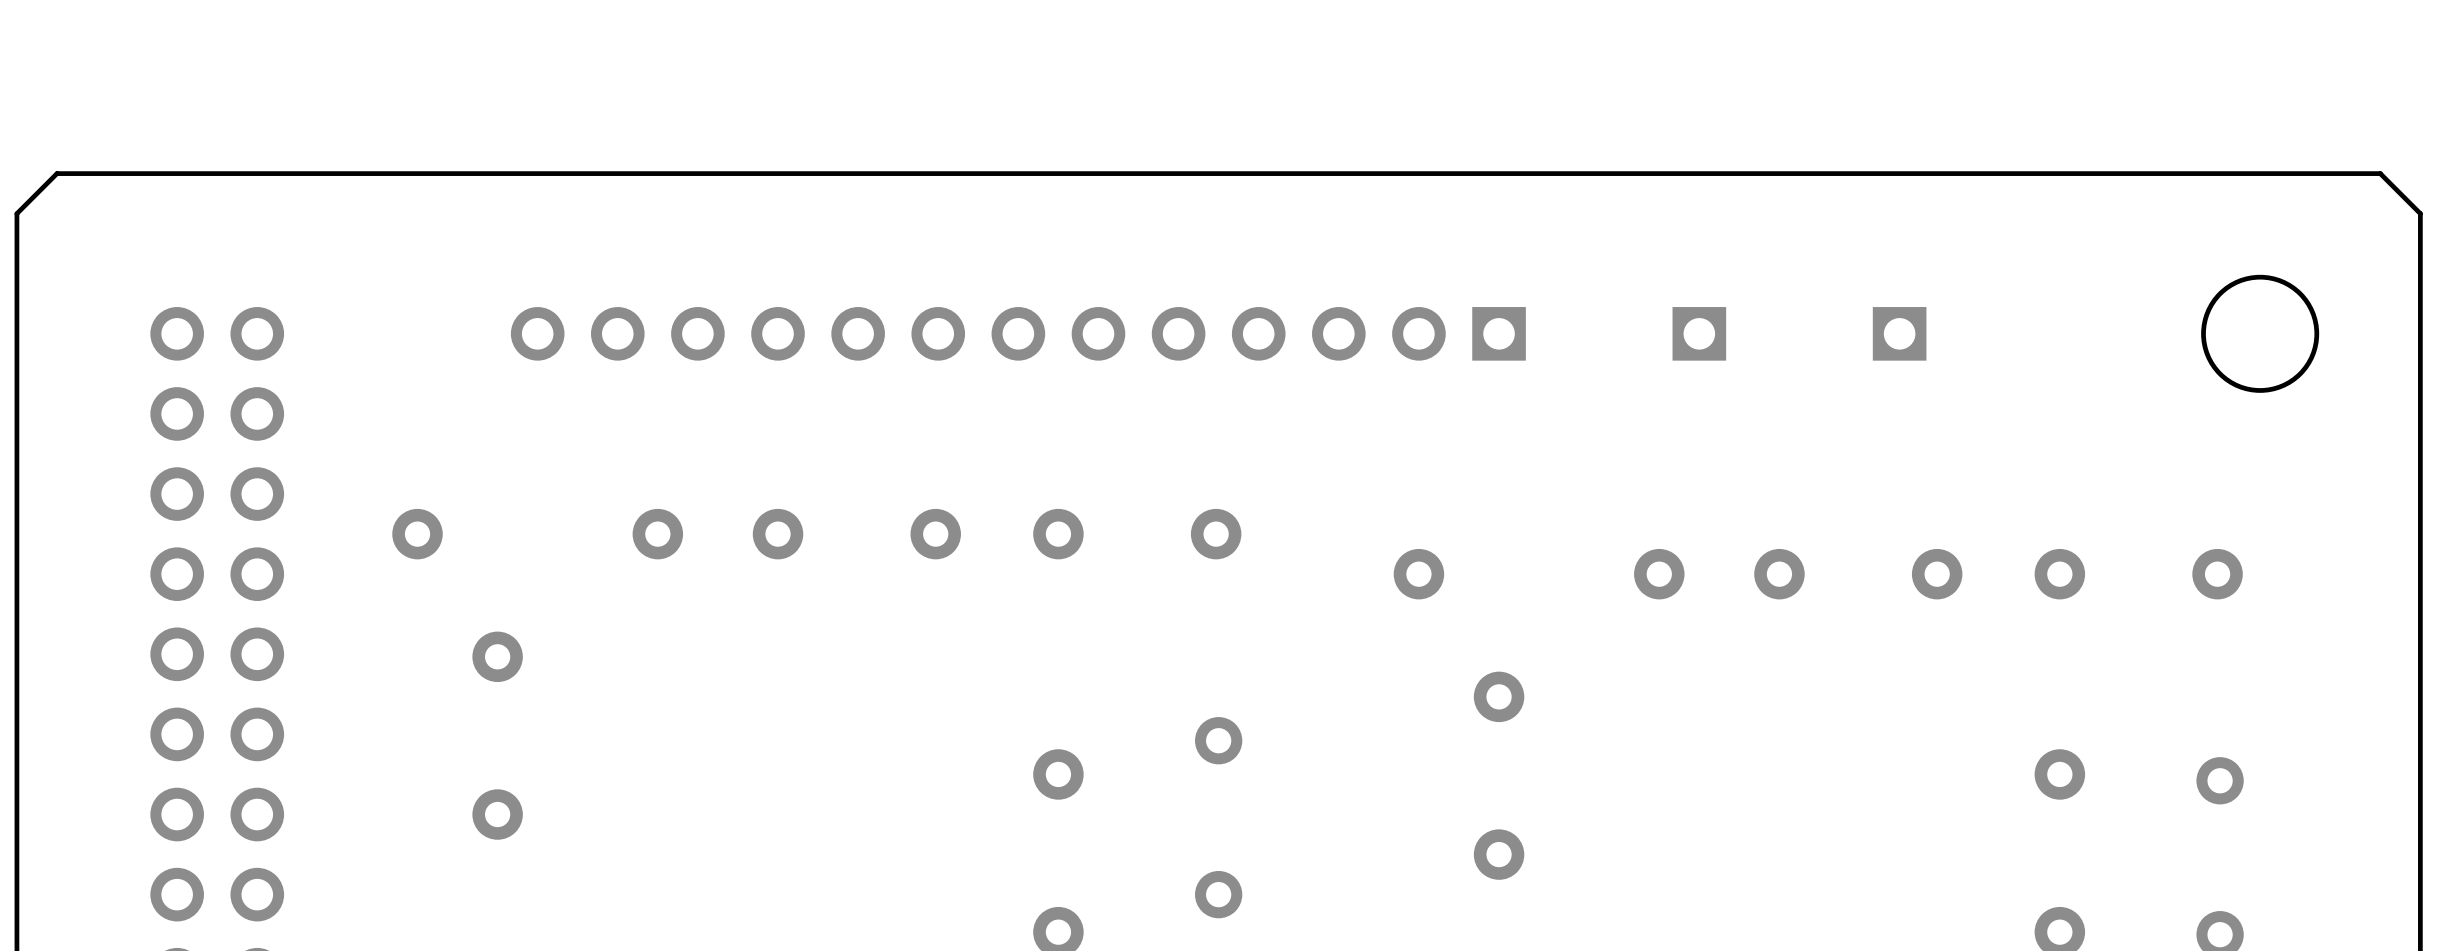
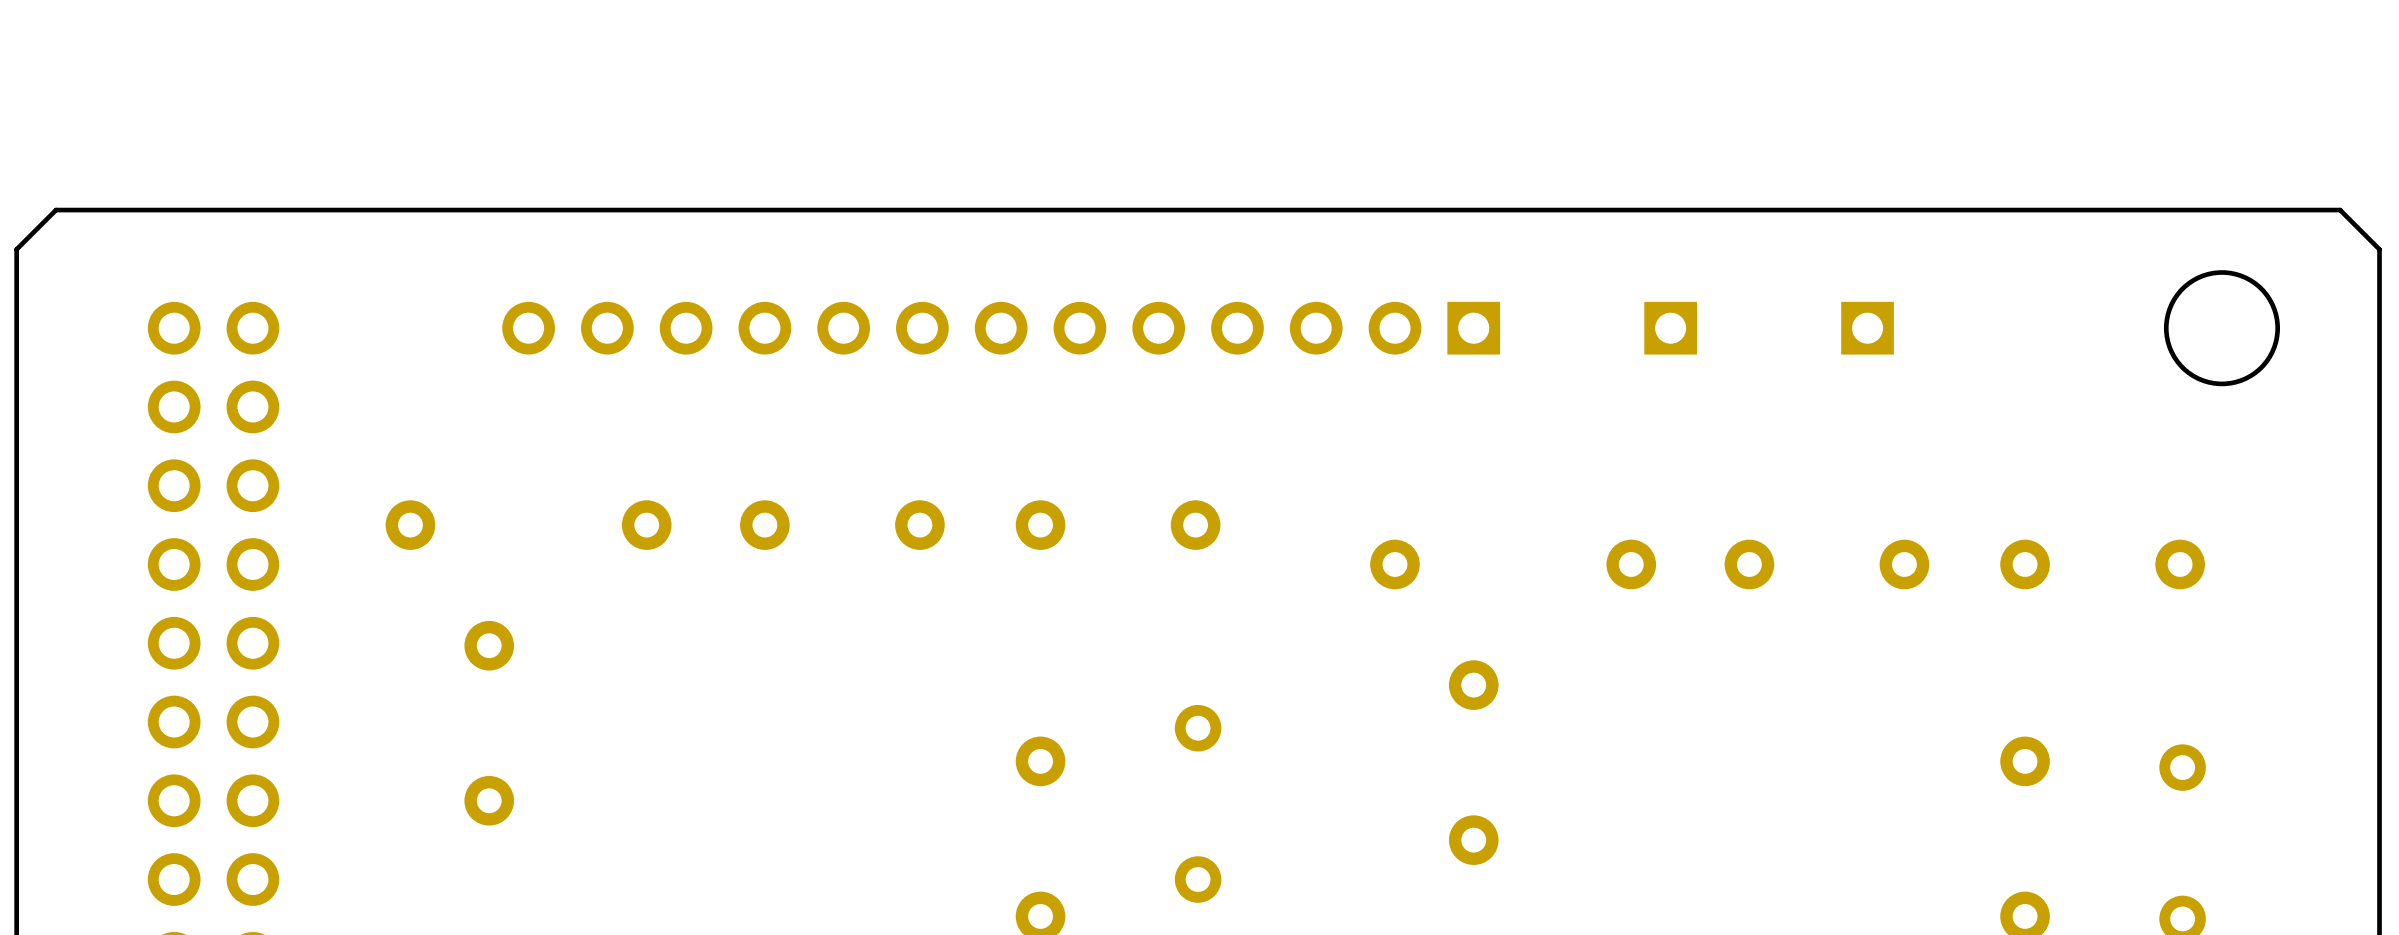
board edge: (2420, 253) (2420, 213) (2380, 173) (56, 173) (16, 213) (16, 253) -> (2379, 249) (2340, 210) (56, 210) (16, 249)

